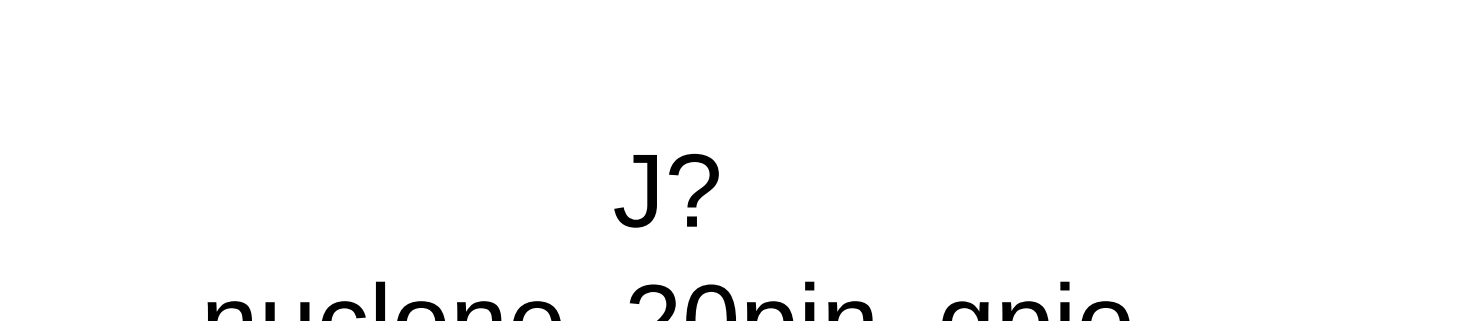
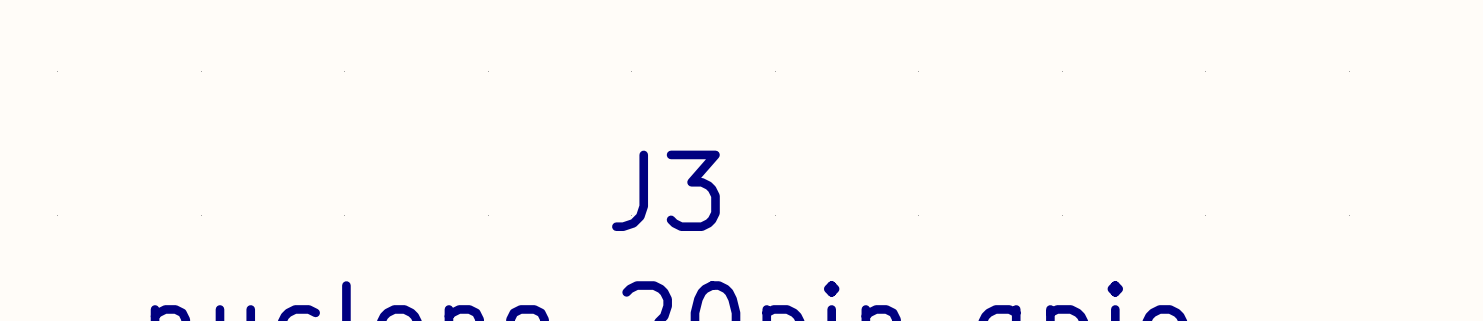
J? name: J? (666, 190) -> J3 (665, 190)

